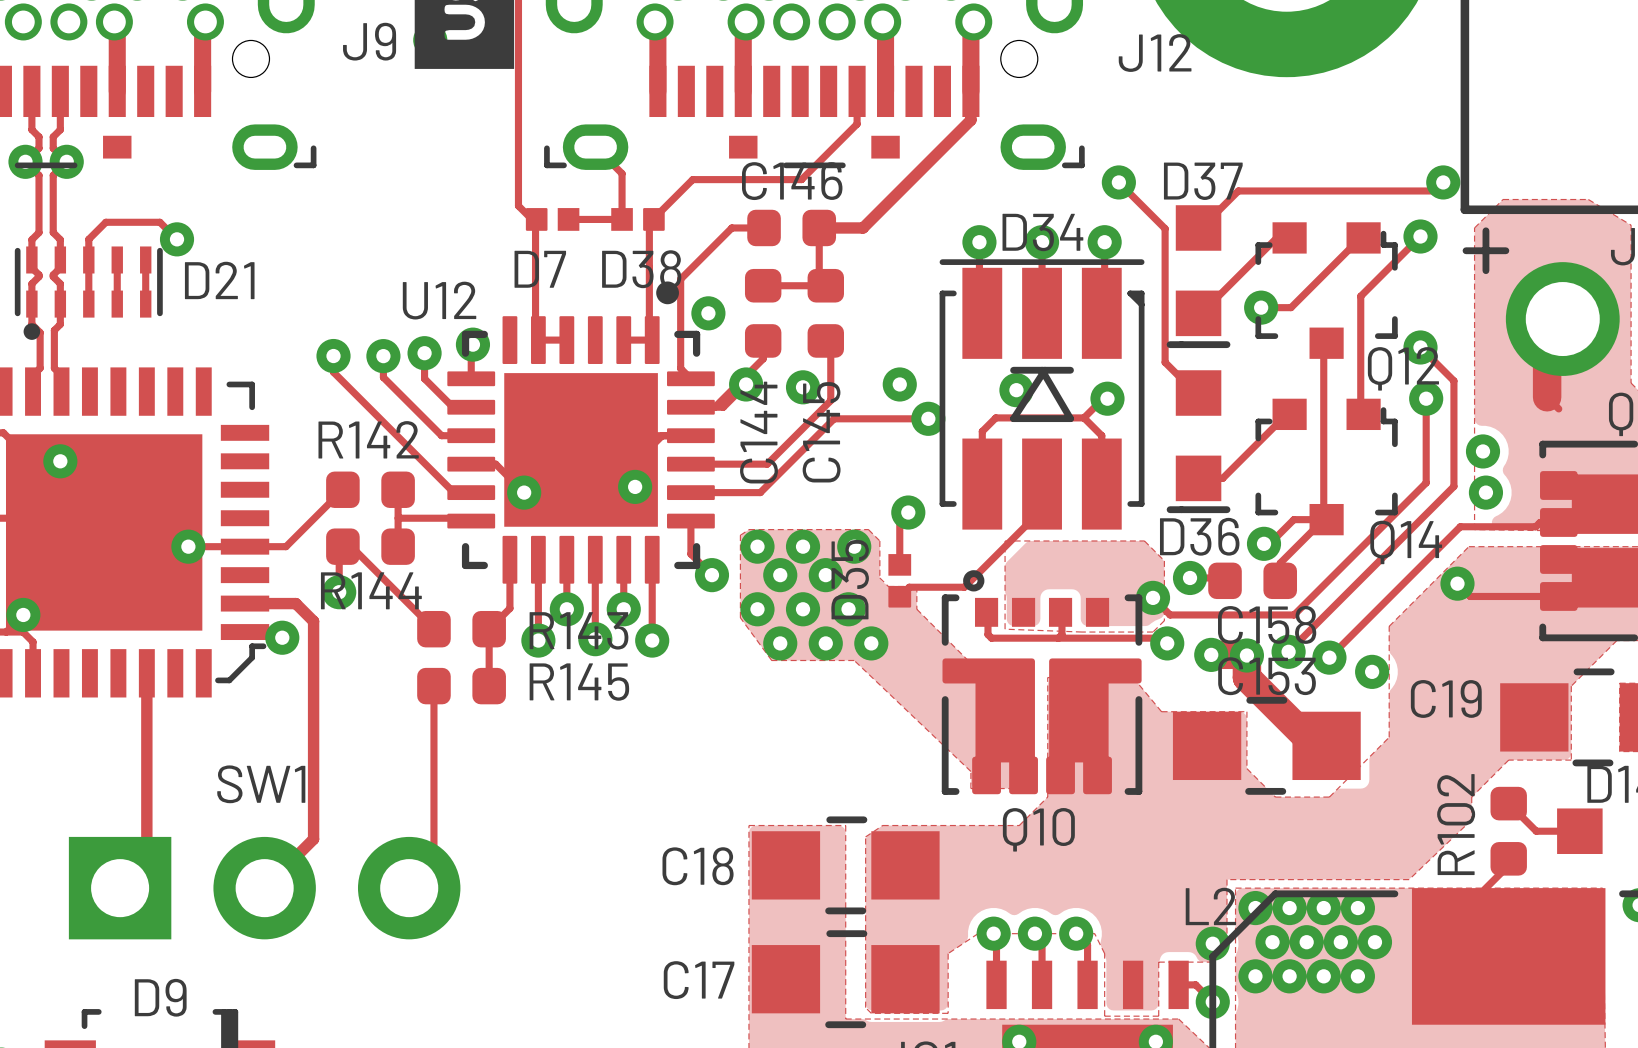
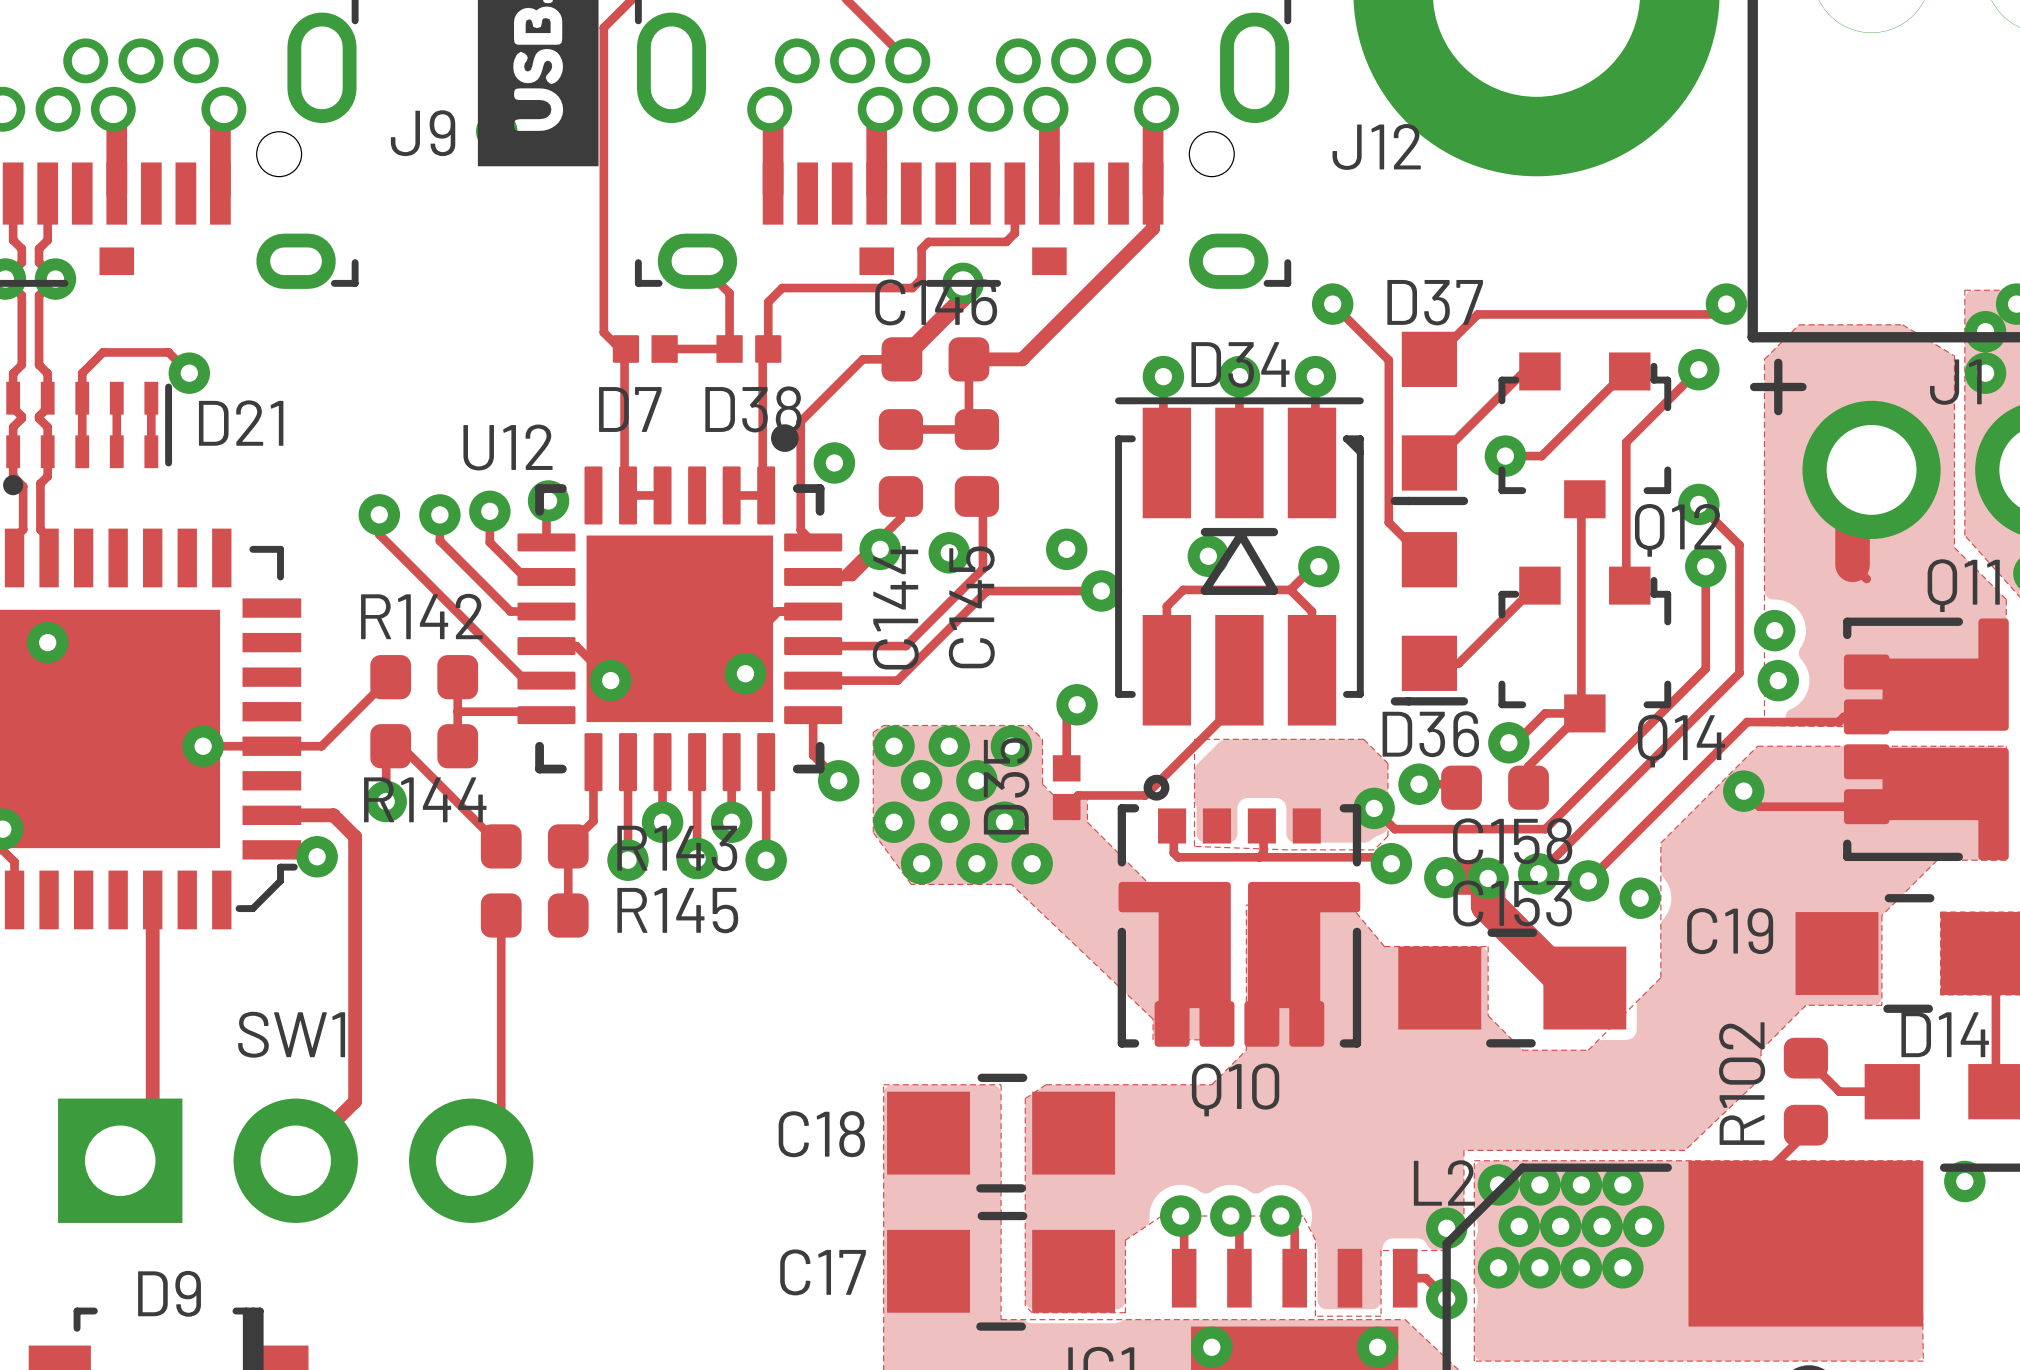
track: (849, 131) (801, 179) (692, 179) (649, 222) -> (1006, 241) (928, 241) (921, 248) (921, 278) (912, 288) (782, 288) (768, 302) (768, 348)
track: none -> (963, 283) (963, 298) (901, 359)
via: none -> (963, 283)

